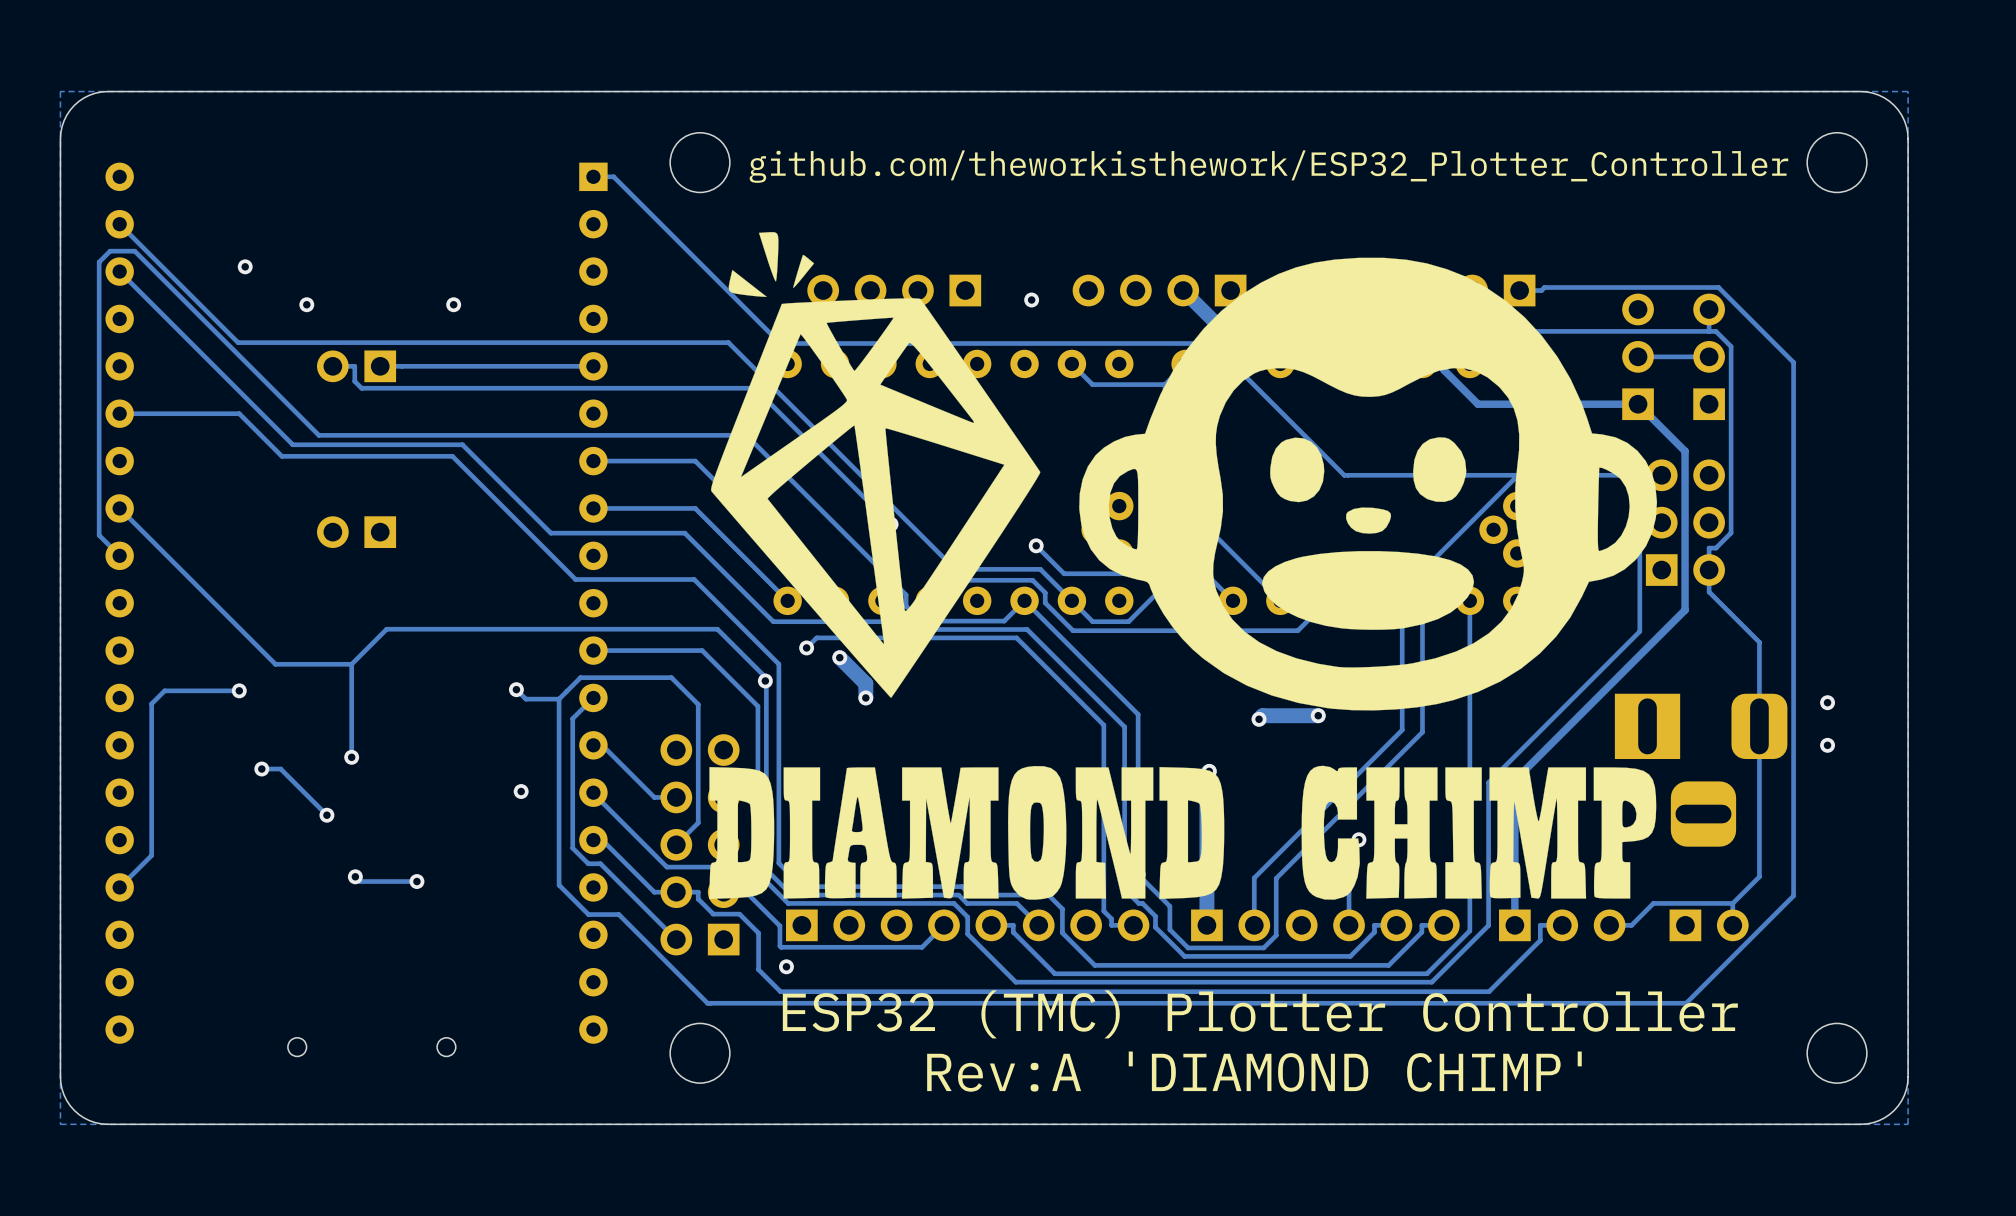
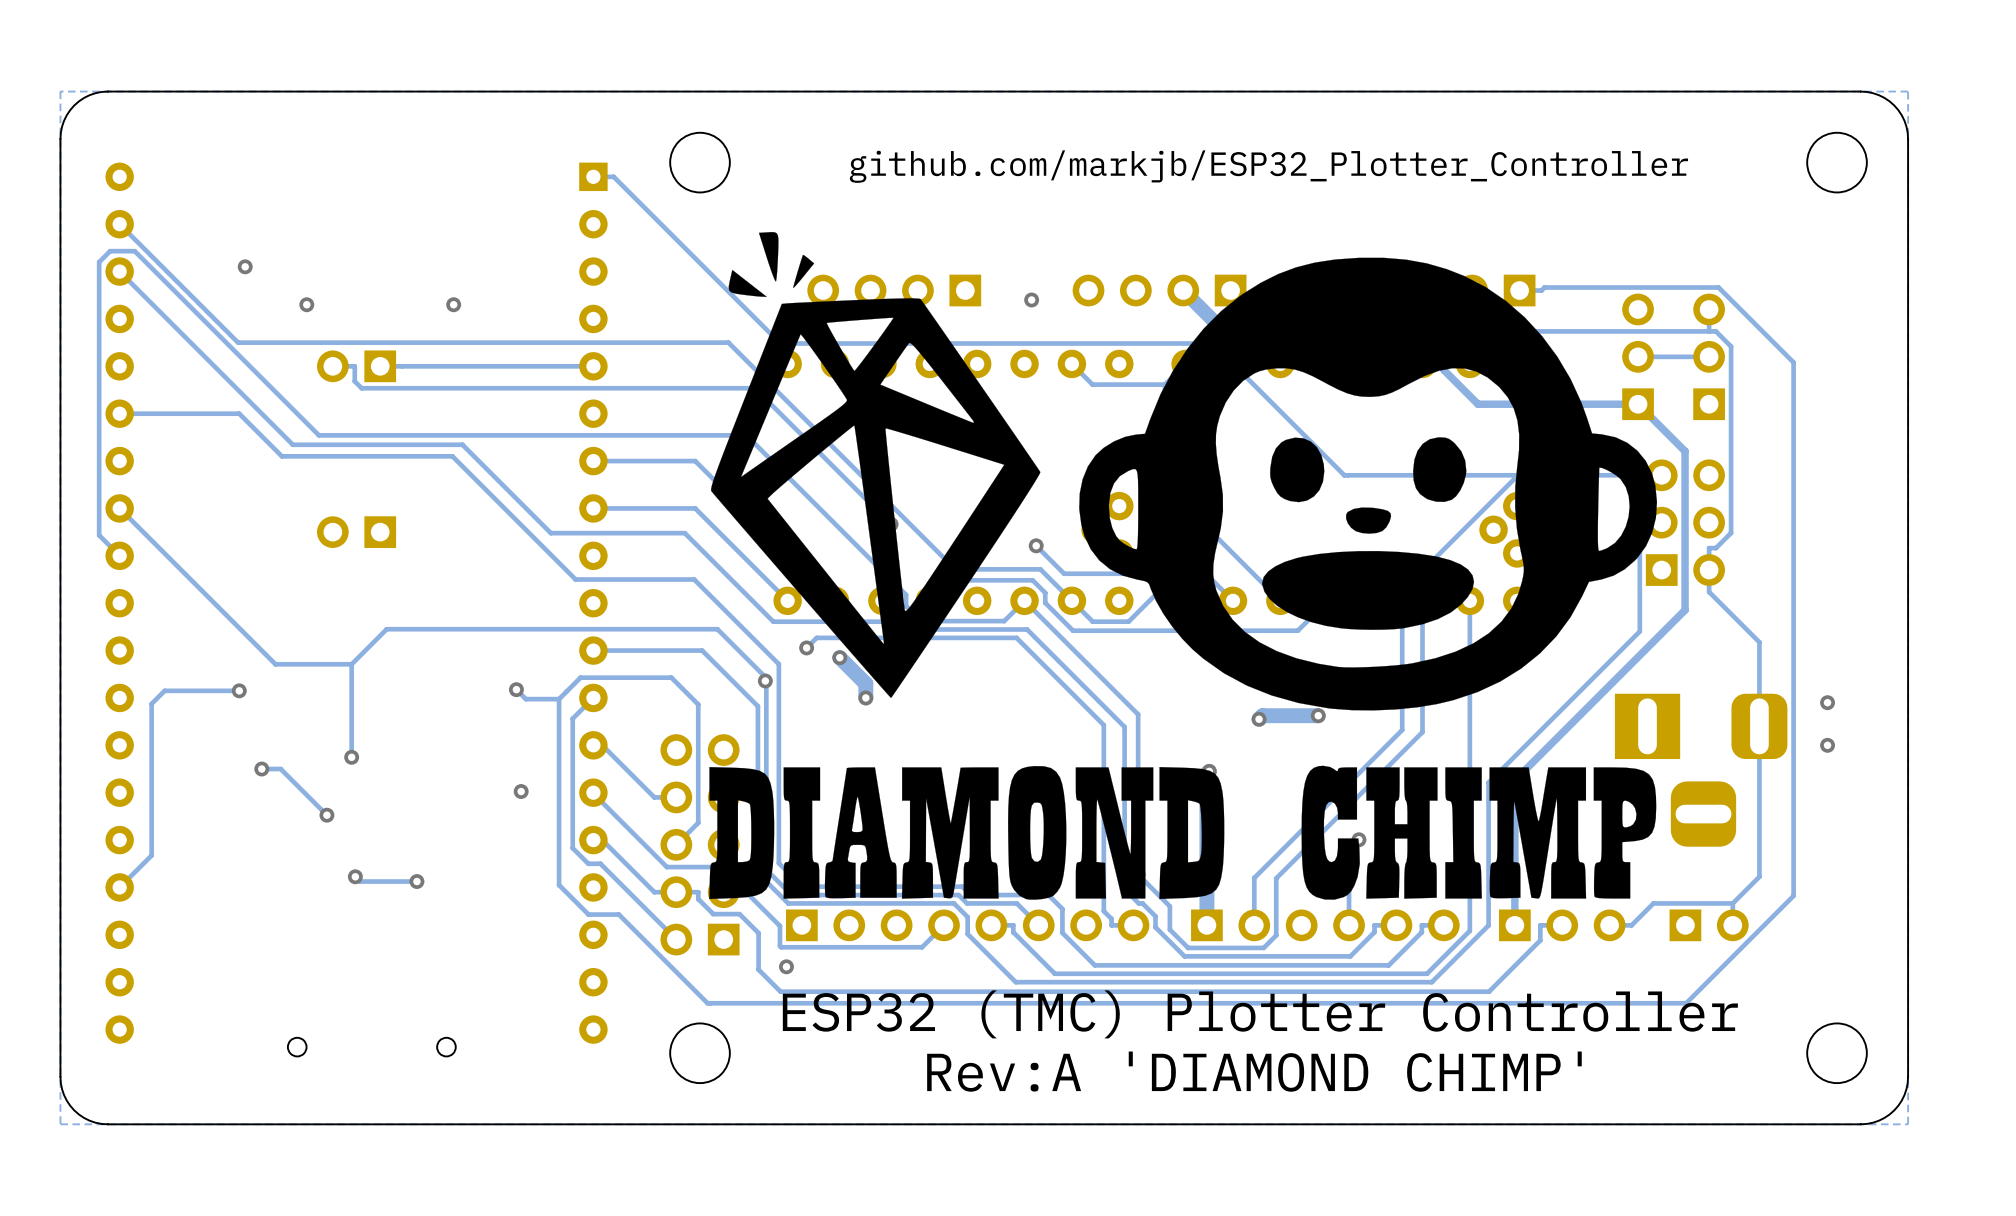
text: github.com/theworkisthework/ESP32_Plotter_Controller (1268, 166) -> github.com/markjb/ESP32_Plotter_Controller (1268, 166)

